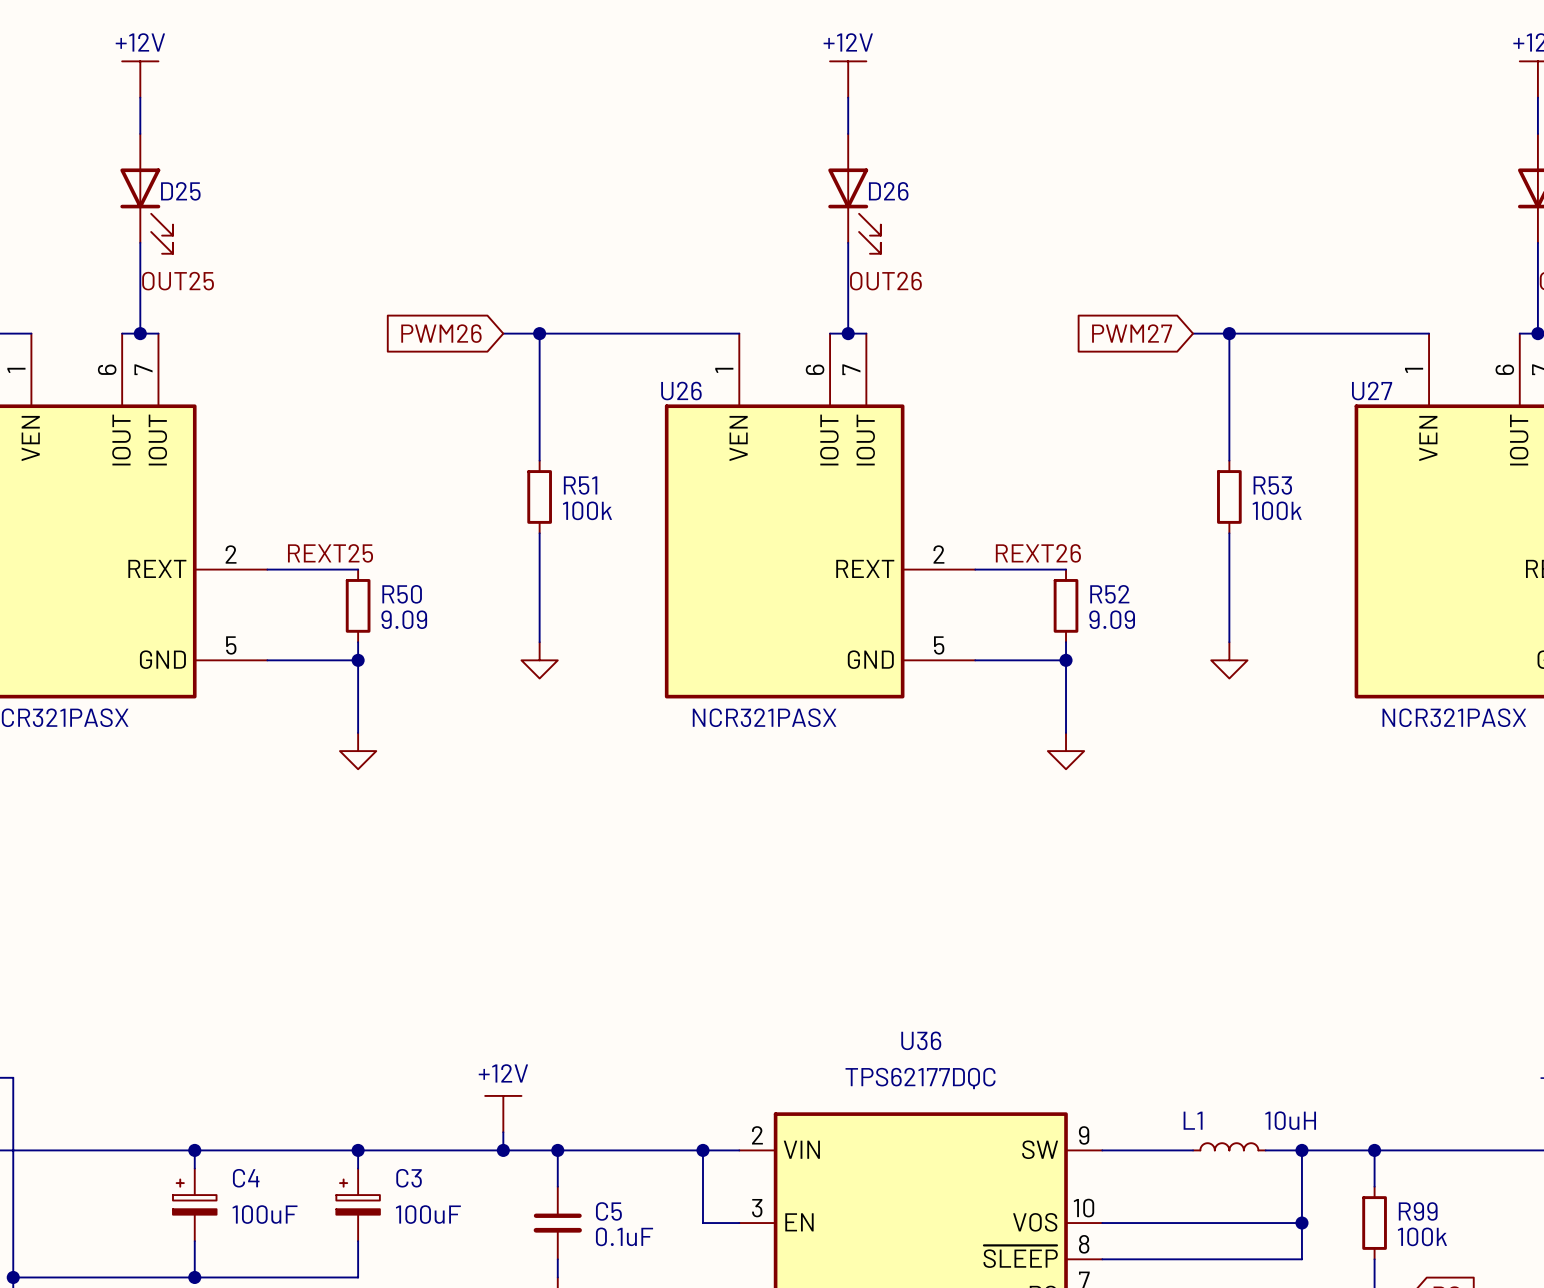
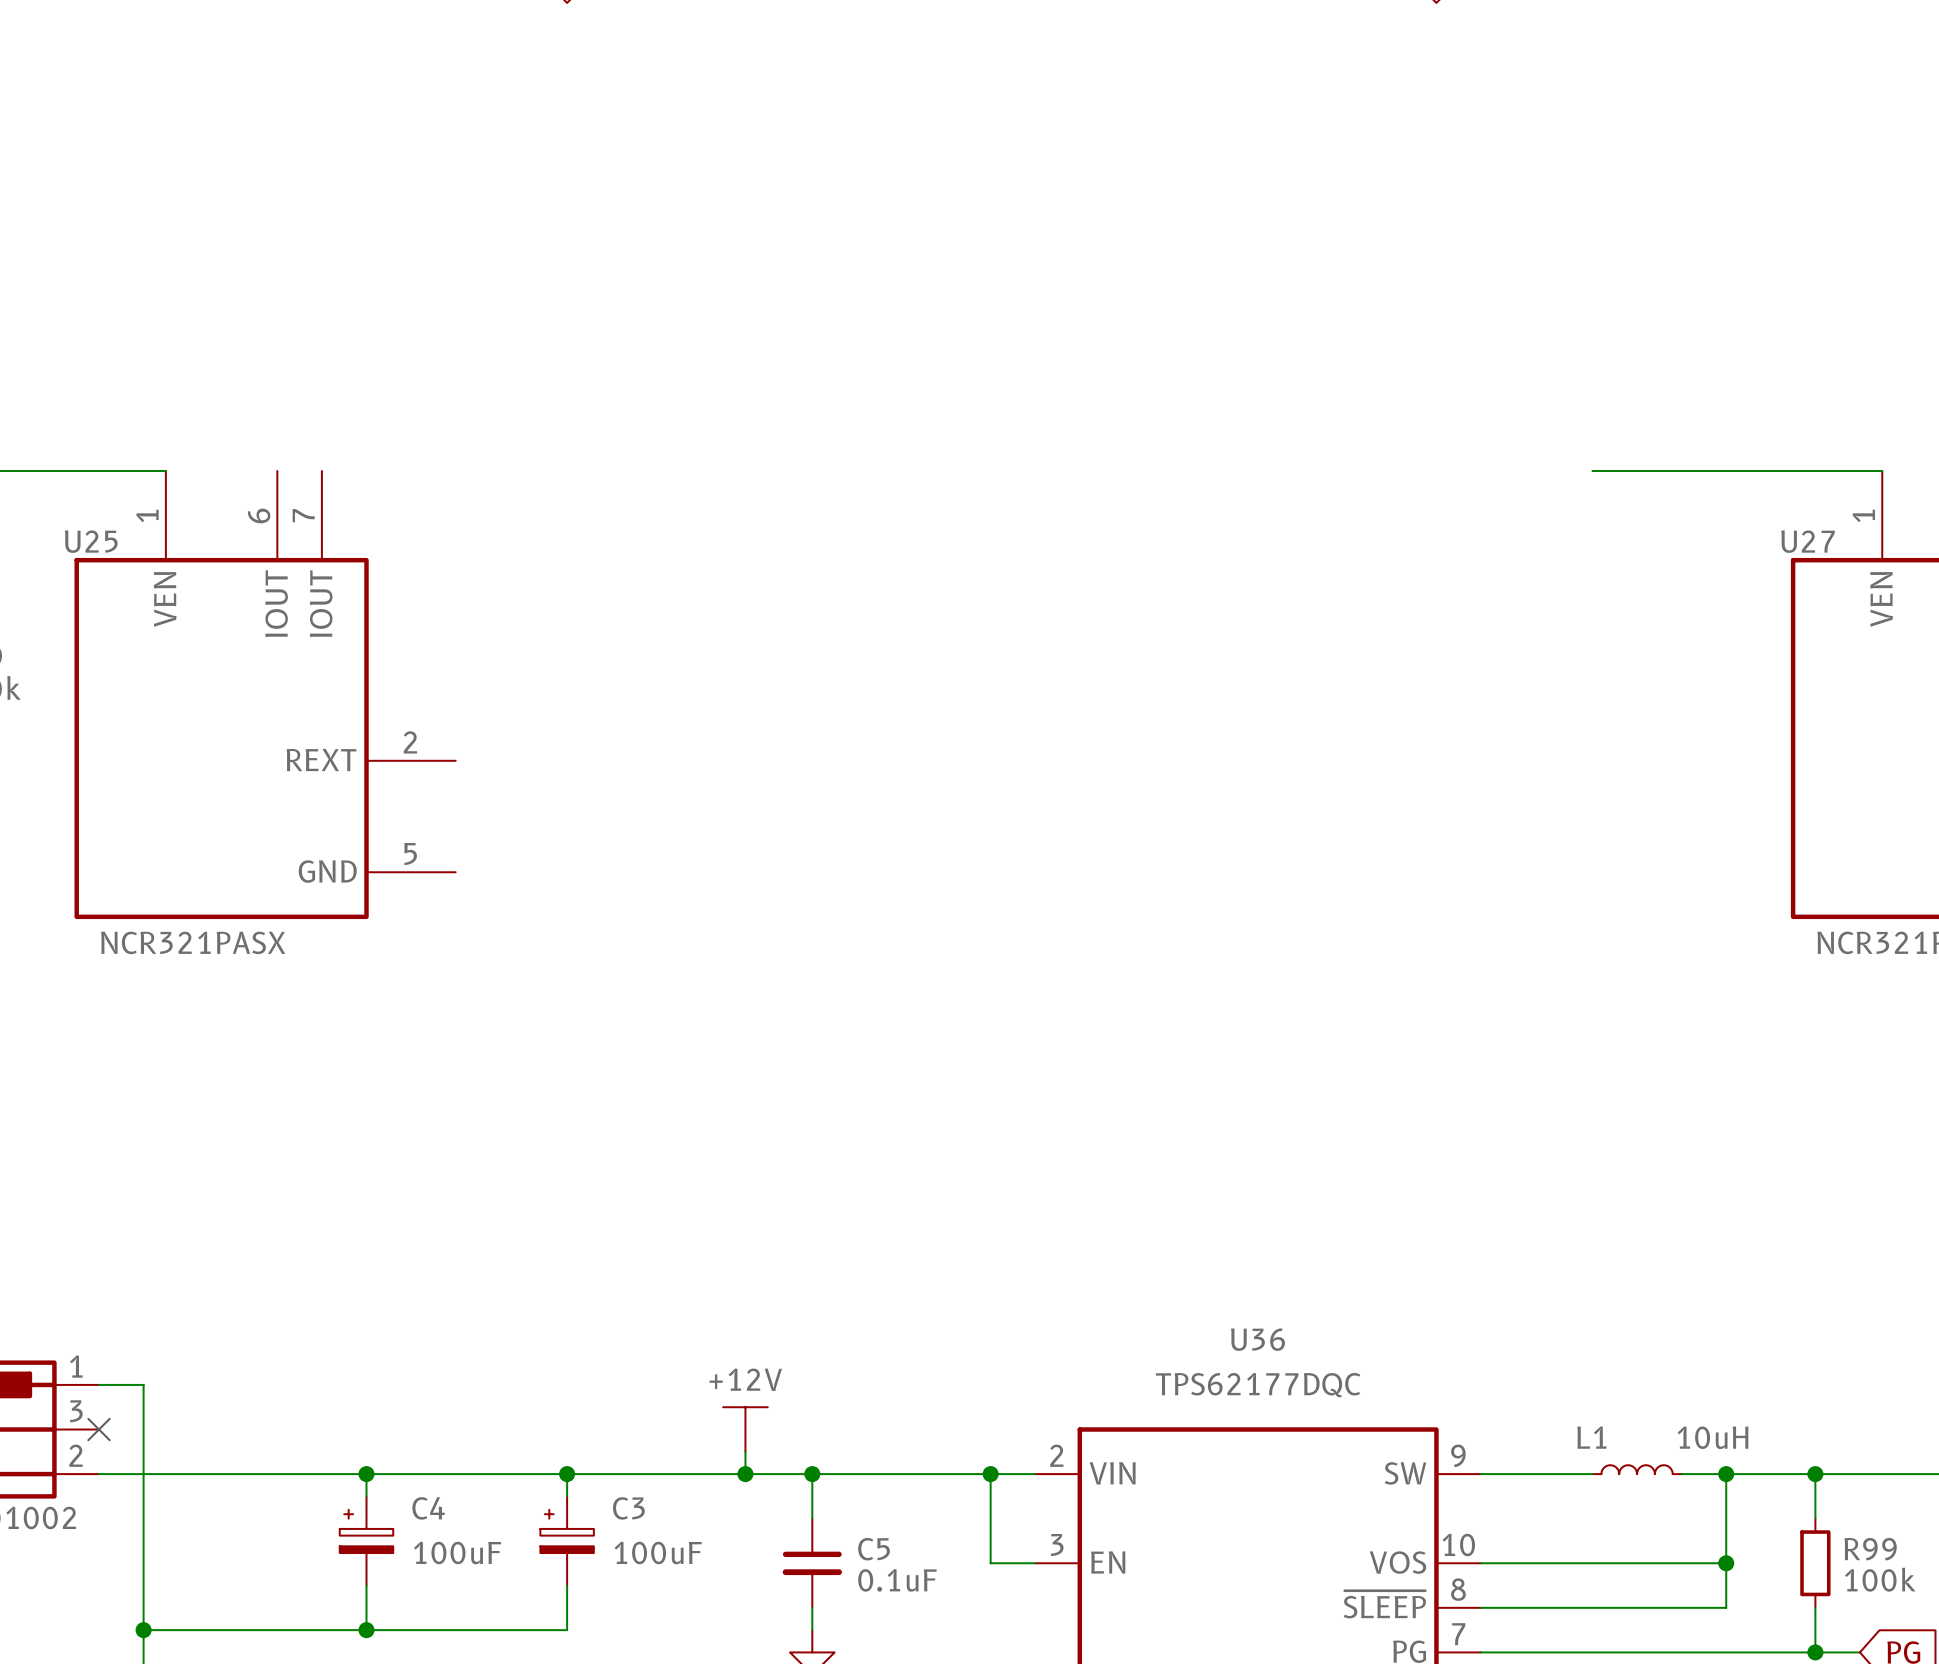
power symbol: +12V (140, 79) -> none
power symbol: +12V (848, 79) -> none
wire: (140, 97) (140, 133) -> none
wire: (848, 97) (848, 133) -> none
D25: (146, 193) -> none
D26: (854, 193) -> none
wire: (140, 242) (140, 333) -> none
wire: (848, 242) (848, 333) -> none
label: OUT25 (178, 281) -> none
label: OUT26 (885, 281) -> none
wire: (122, 333) (158, 333) -> none
junction: (140, 333) -> none
global label: PWM26 (441, 333) -> none
wire: (503, 333) (739, 333) -> none
wire: (539, 333) (539, 460) -> none
junction: (539, 333) -> none
wire: (830, 333) (866, 333) -> none
junction: (848, 333) -> none
global label: PWM27 (1132, 333) -> none
wire: (1229, 333) (1229, 460) -> none
junction: (1229, 333) -> none
R51: 100k (539, 496) -> none
R53: 100k (1229, 496) -> none
U26: NCR321PASX (820, 516) -> none
wire: (539, 533) (539, 642) -> none
wire: (1229, 533) (1229, 642) -> none
label: REXT25 (330, 553) -> none
label: REXT26 (1038, 553) -> none
wire: (267, 569) (358, 569) -> none
wire: (975, 569) (1066, 569) -> none
R50: 9.09 (358, 605) -> none
R52: 9.09 (1066, 605) -> none
wire: (358, 642) (358, 732) -> none
wire: (1066, 642) (1066, 732) -> none
wire: (267, 660) (358, 660) -> none
junction: (358, 660) -> none
power symbol: (539, 660) -> none
wire: (975, 660) (1066, 660) -> none
junction: (1066, 660) -> none
power symbol: (1229, 660) -> none
power symbol: (358, 751) -> none
power symbol: (1066, 751) -> none

